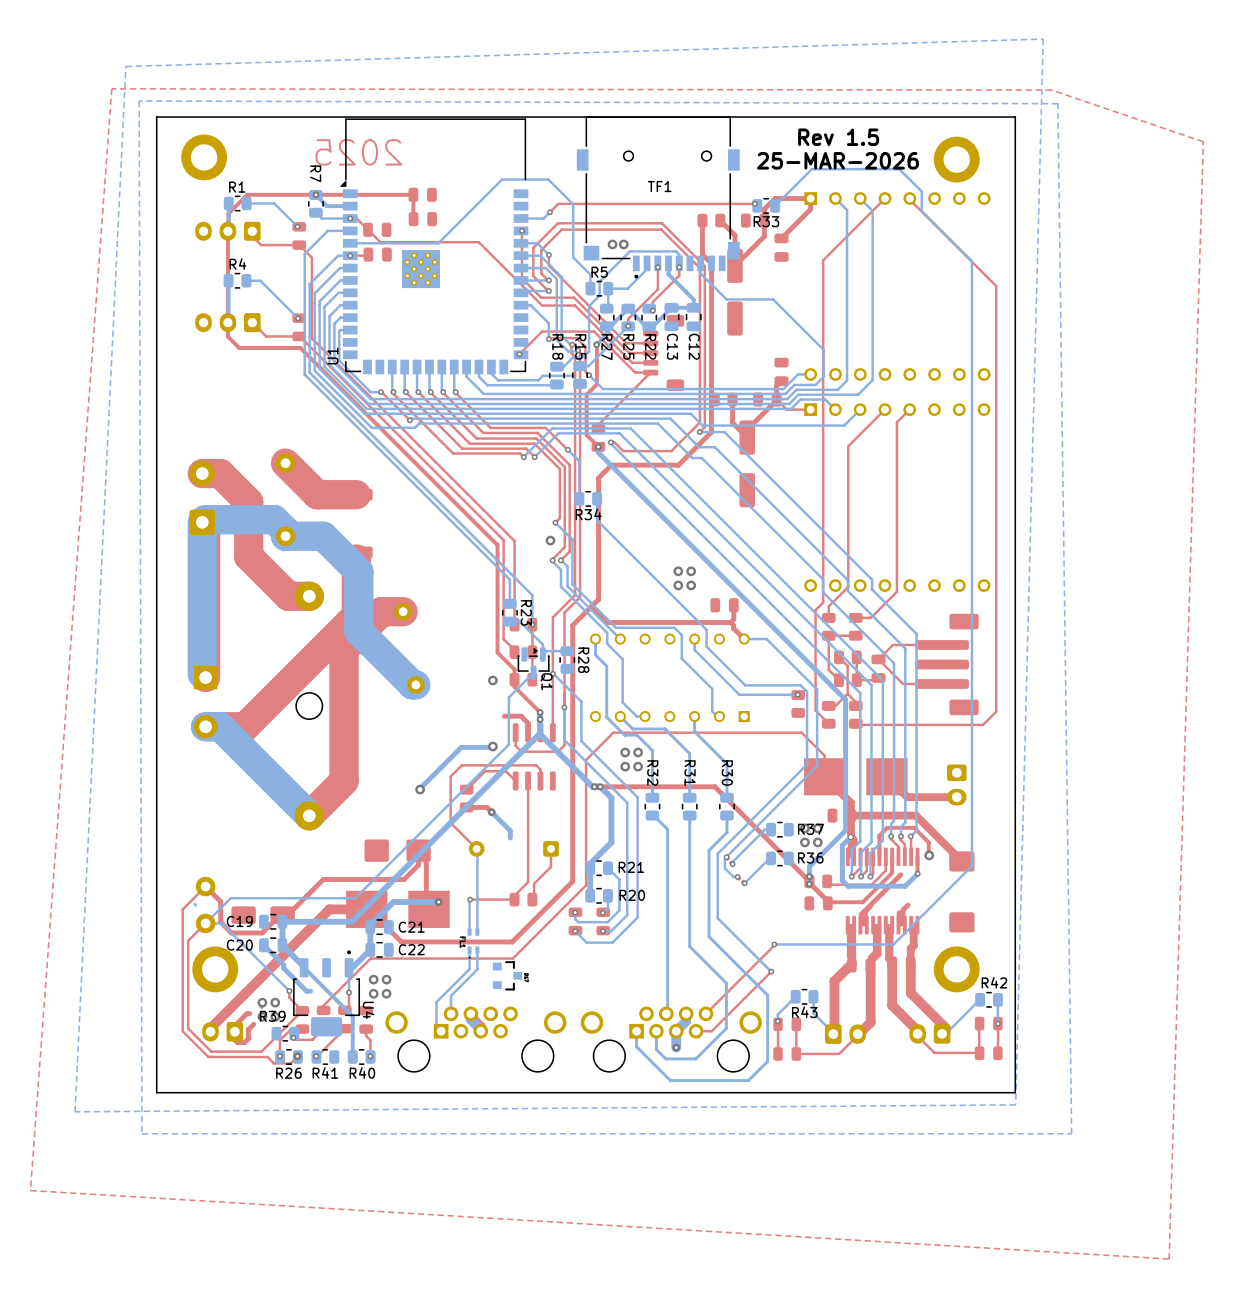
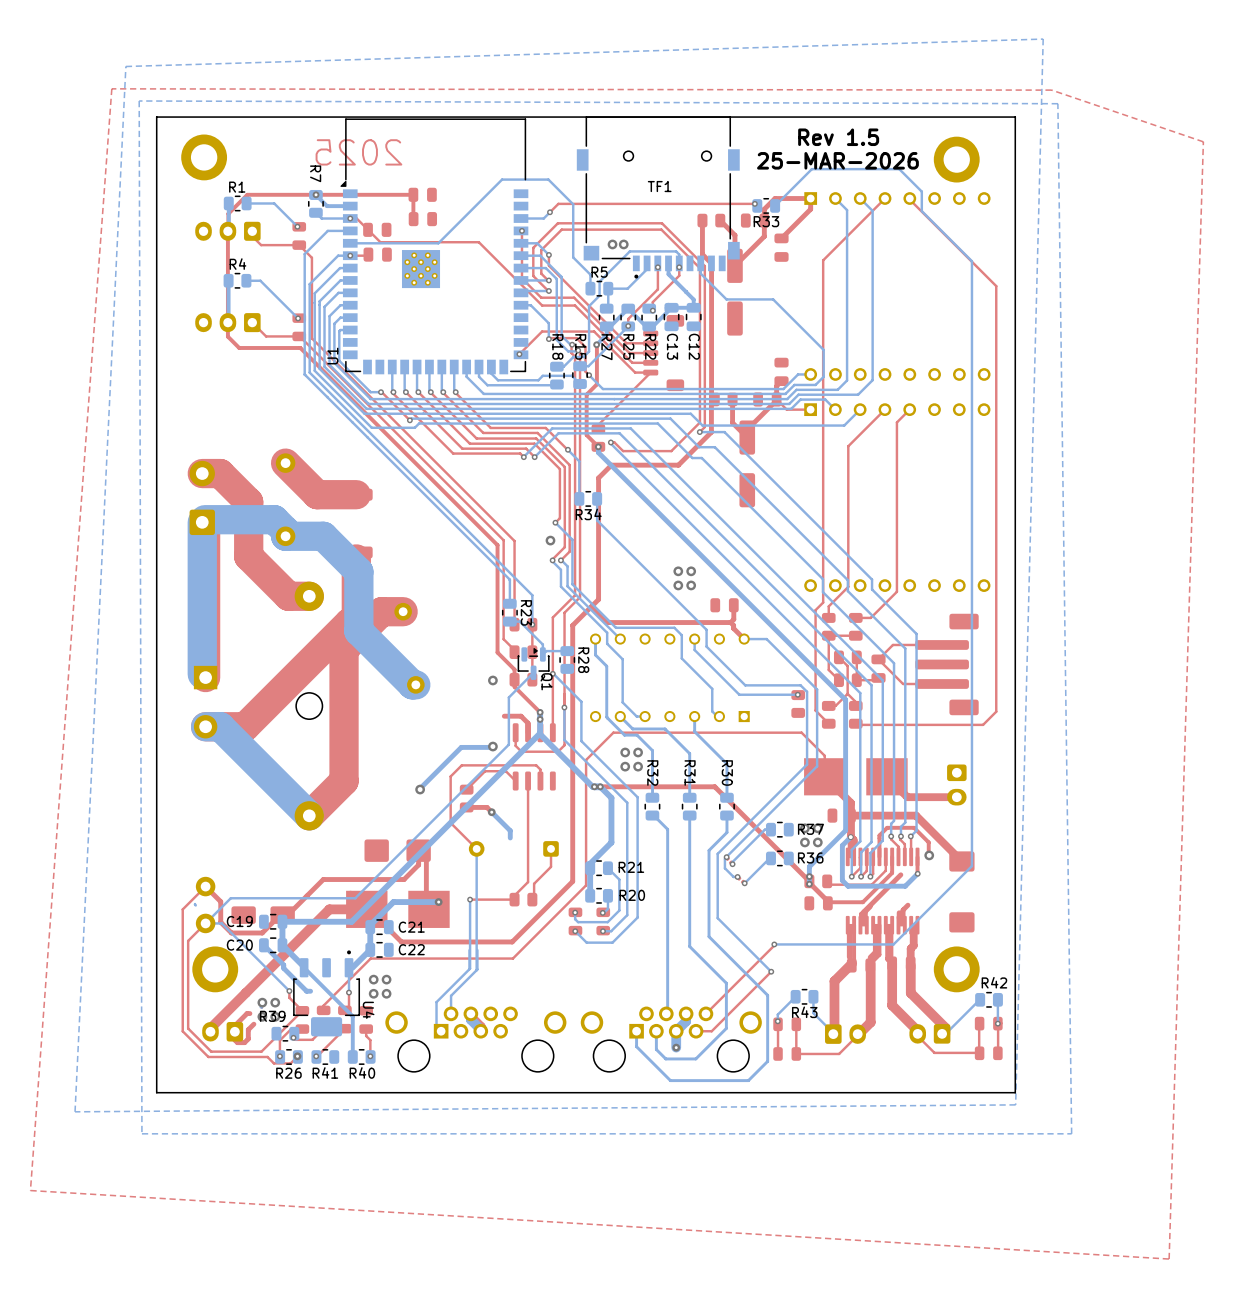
bottom track: (476, 848) (477, 932) -> (476, 848) (476, 970)
bottom track: (470, 899) (469, 932) -> (470, 899) (469, 969)
part: (473, 943) -> none
part: (507, 975) -> none

